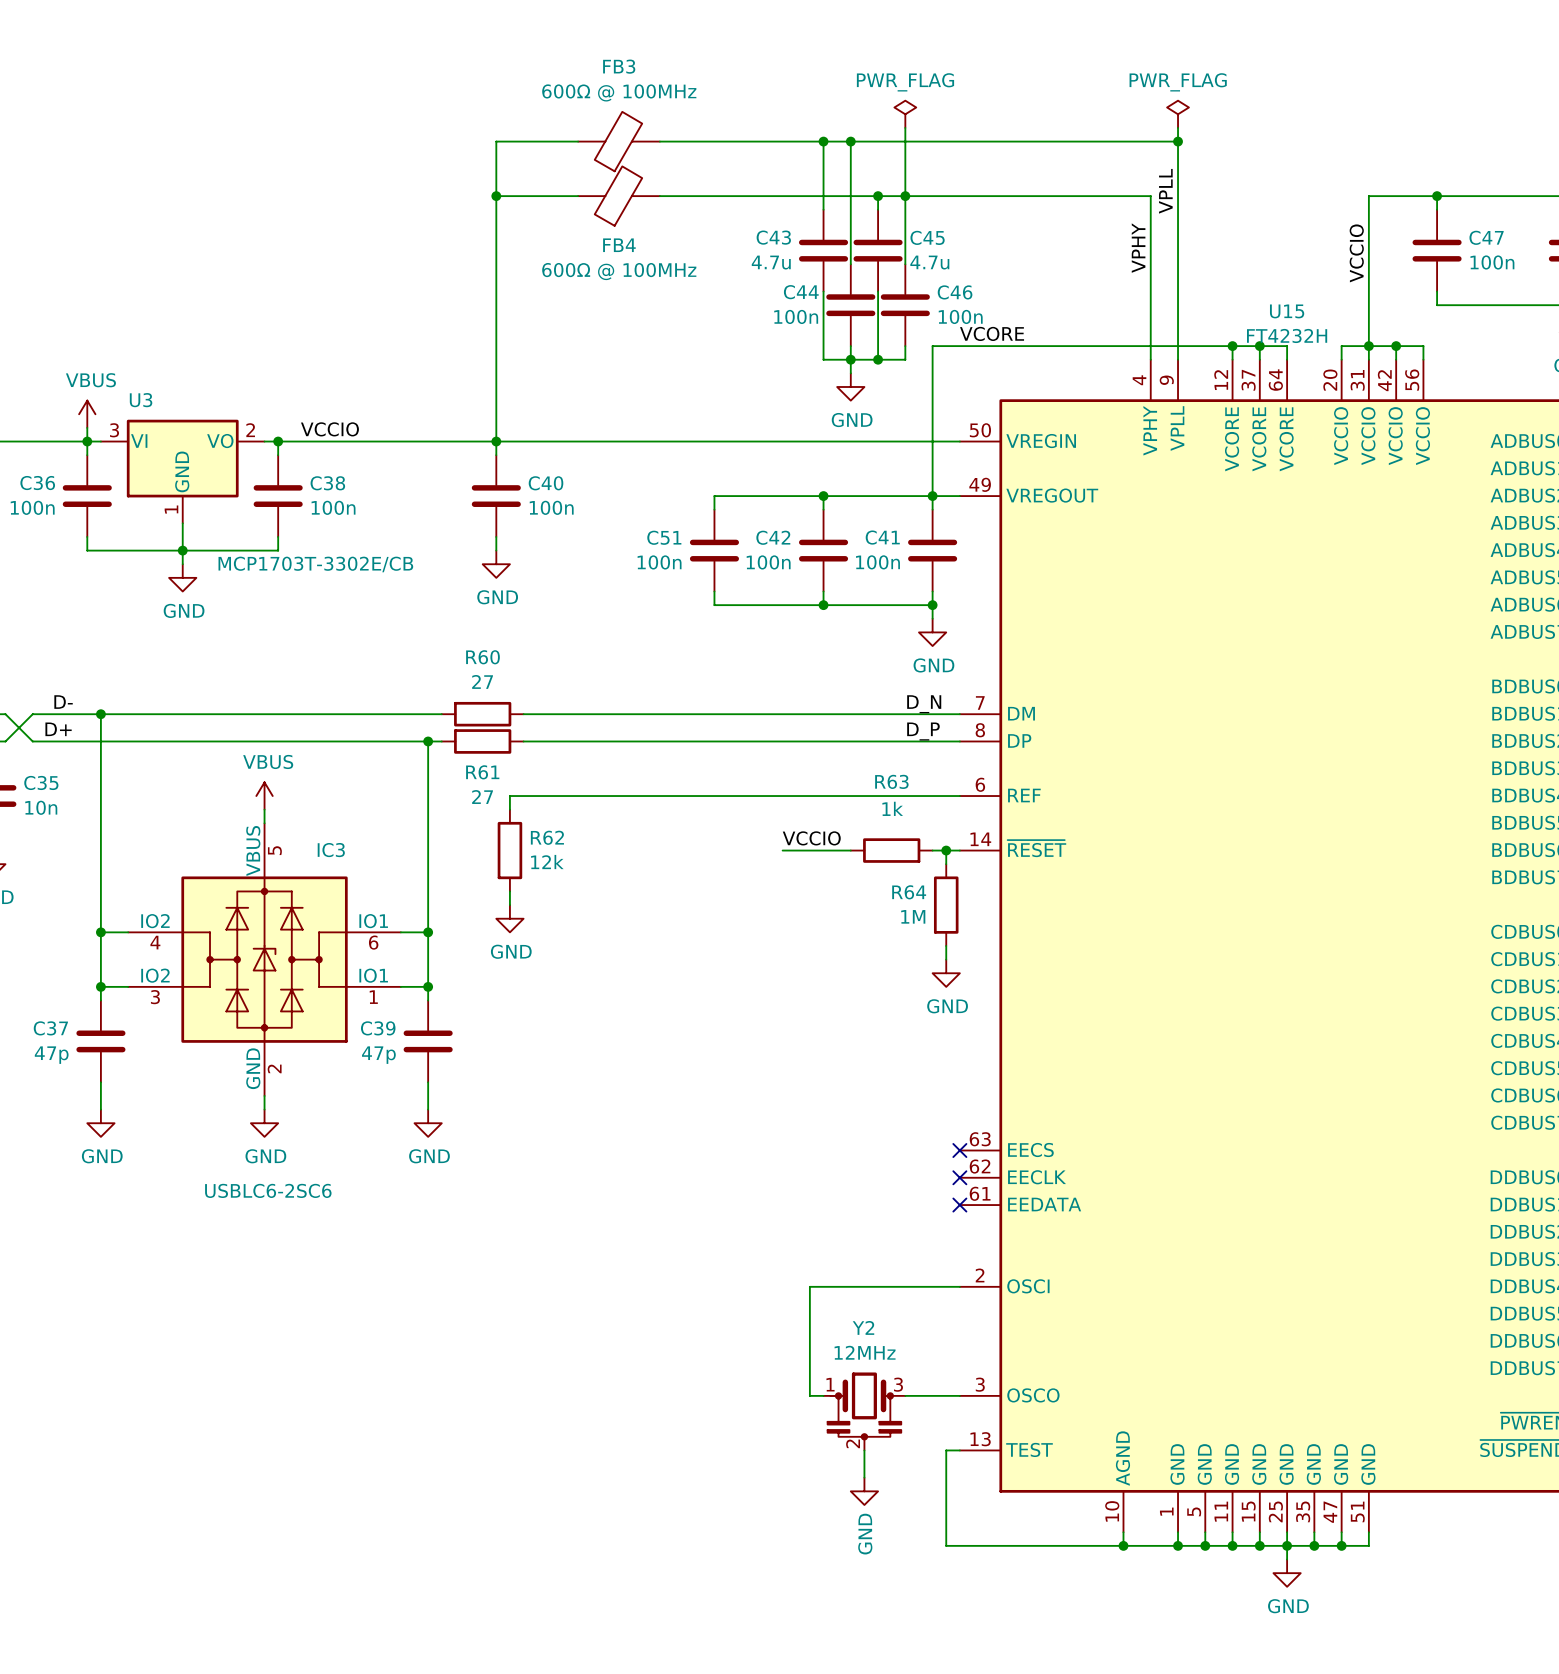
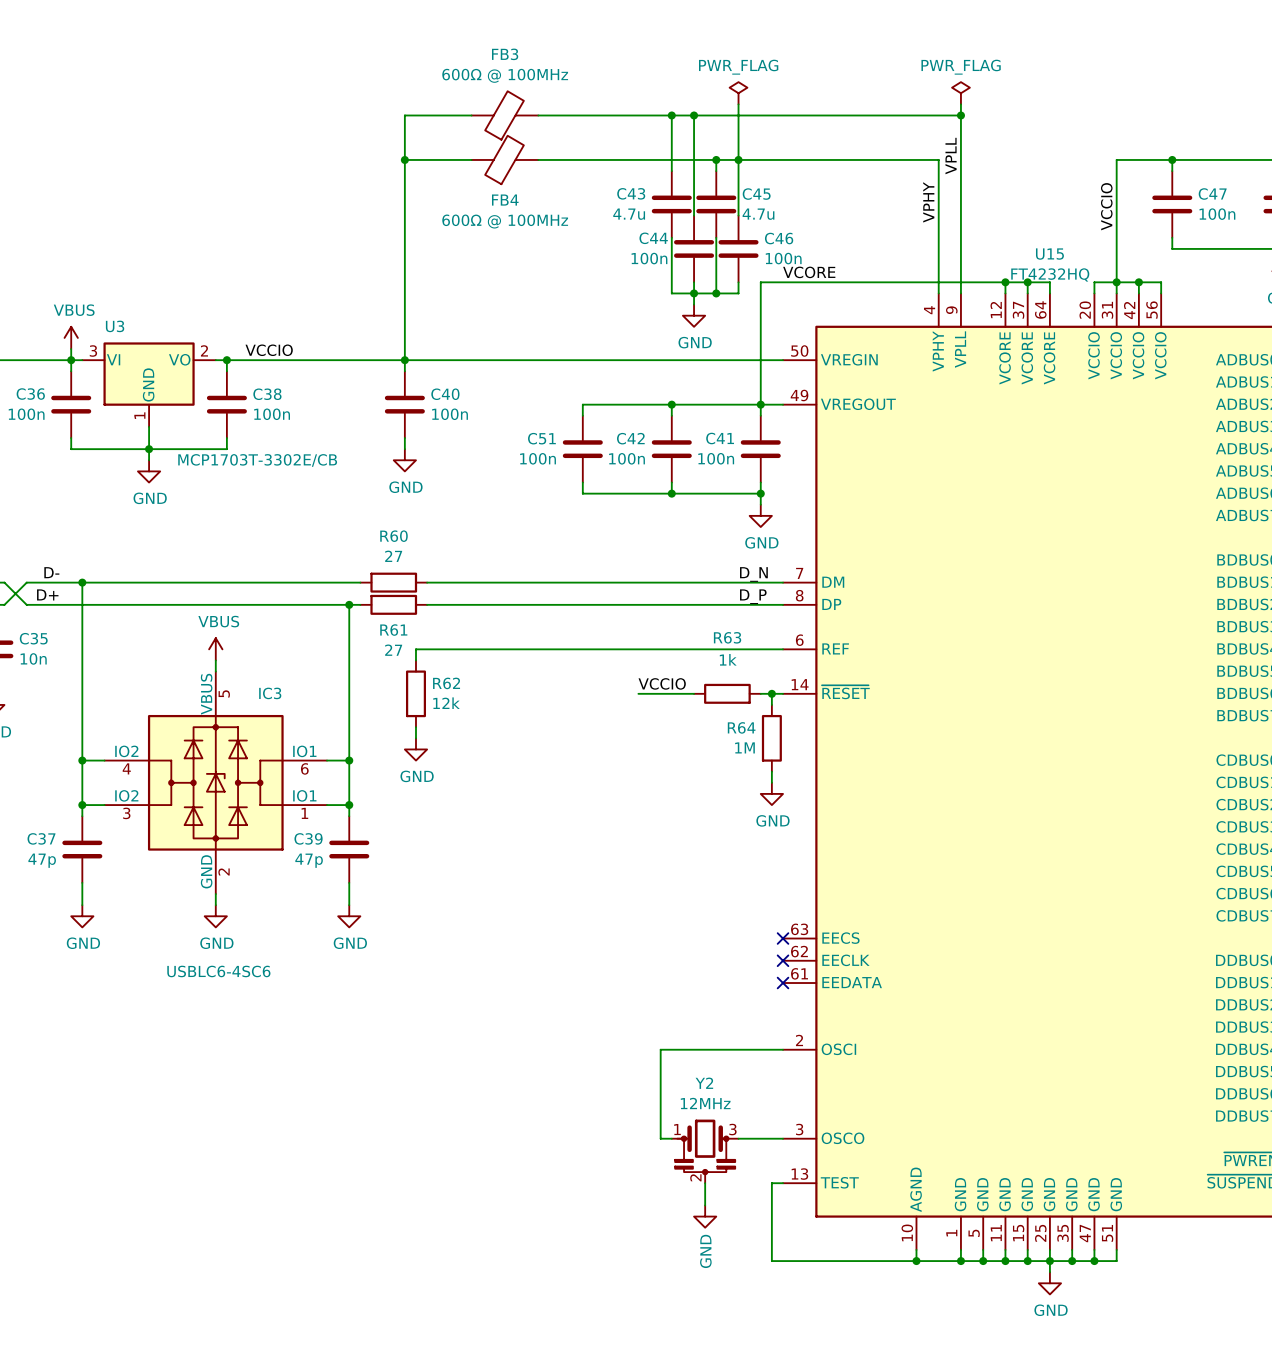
U15 value: FT4232H (1287, 335) -> FT4232HQ (1050, 274)
IC3 value: USBLC6-2SC6 (268, 1190) -> USBLC6-4SC6 (218, 971)

